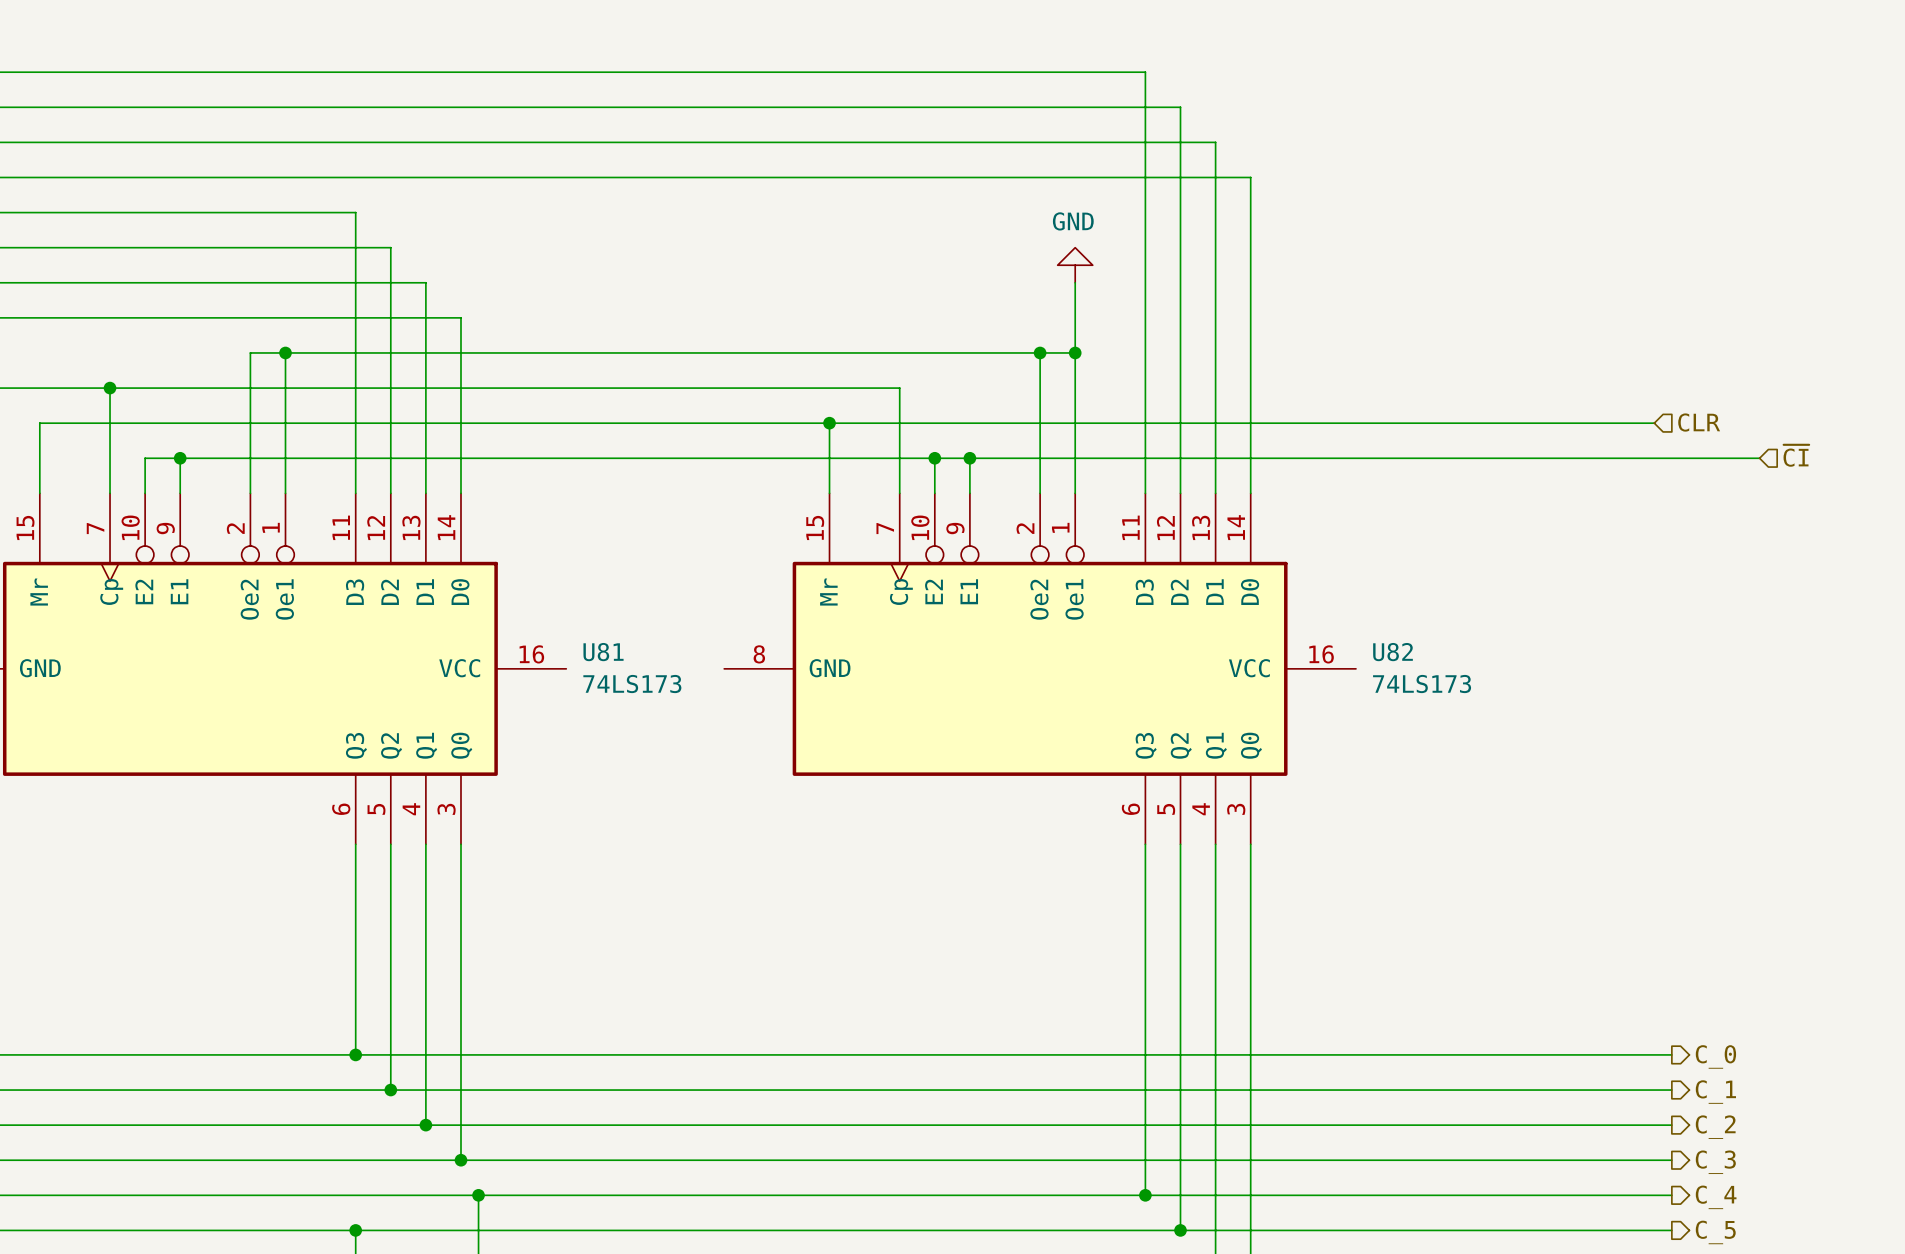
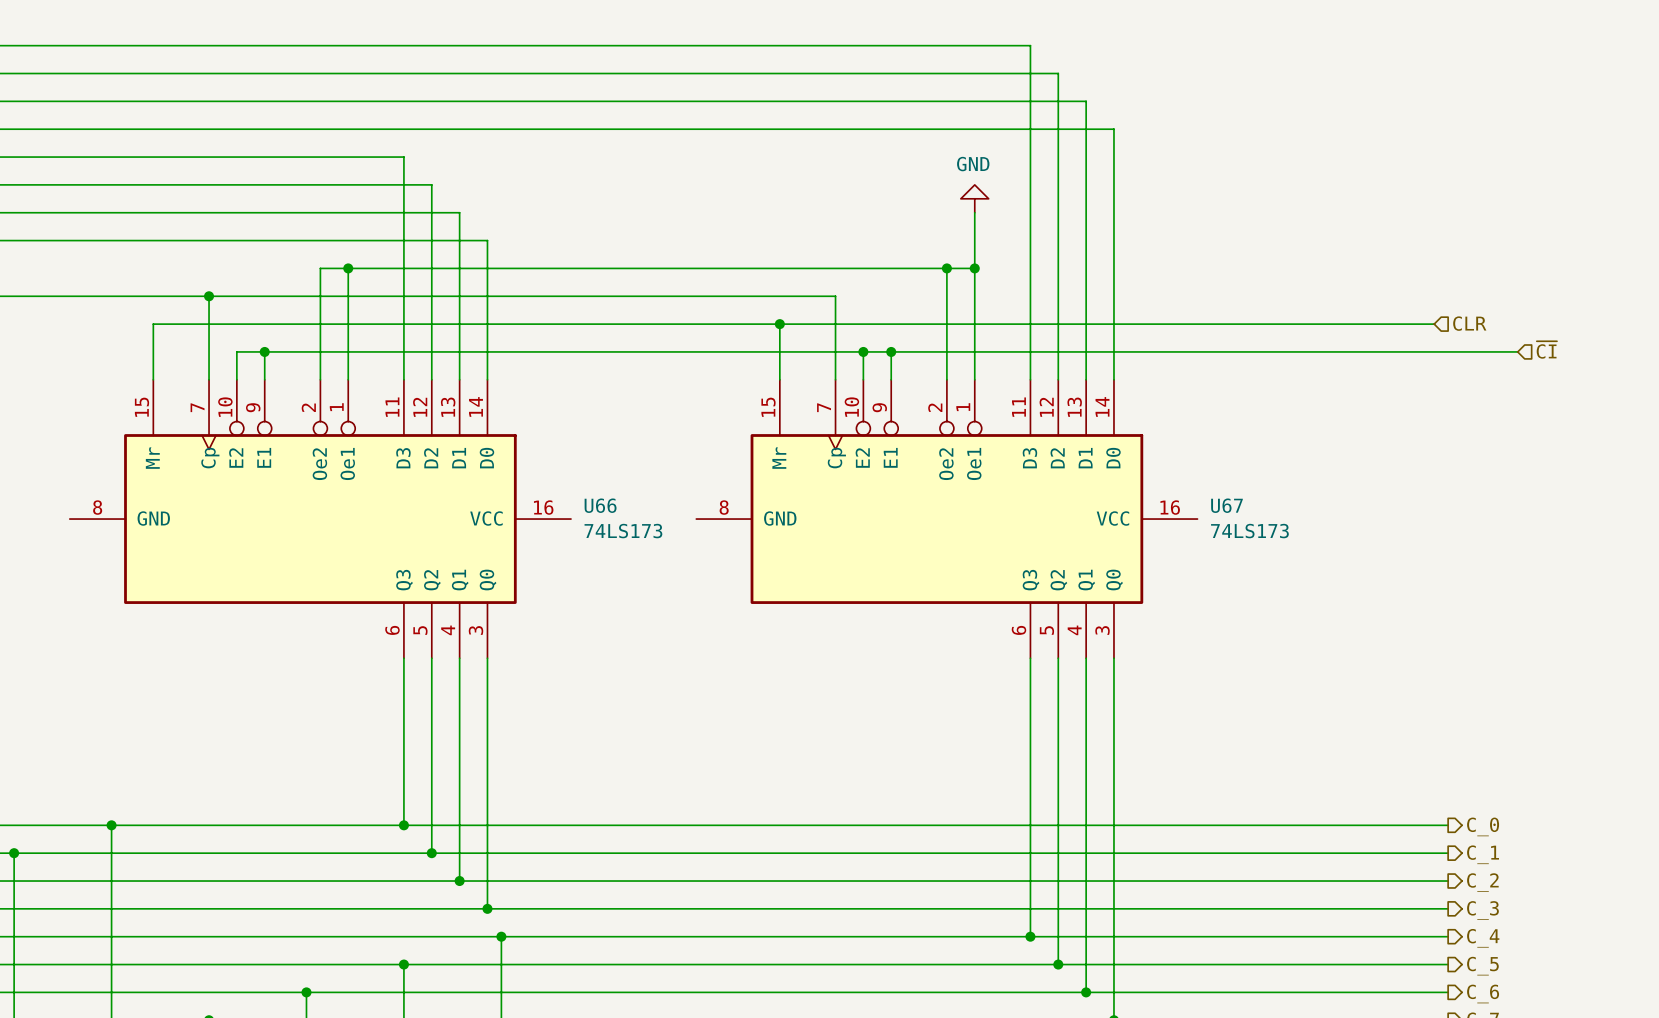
U81 name: U81 (603, 652) -> U66 (600, 505)
U82 name: U82 (1393, 652) -> U67 (1226, 505)

